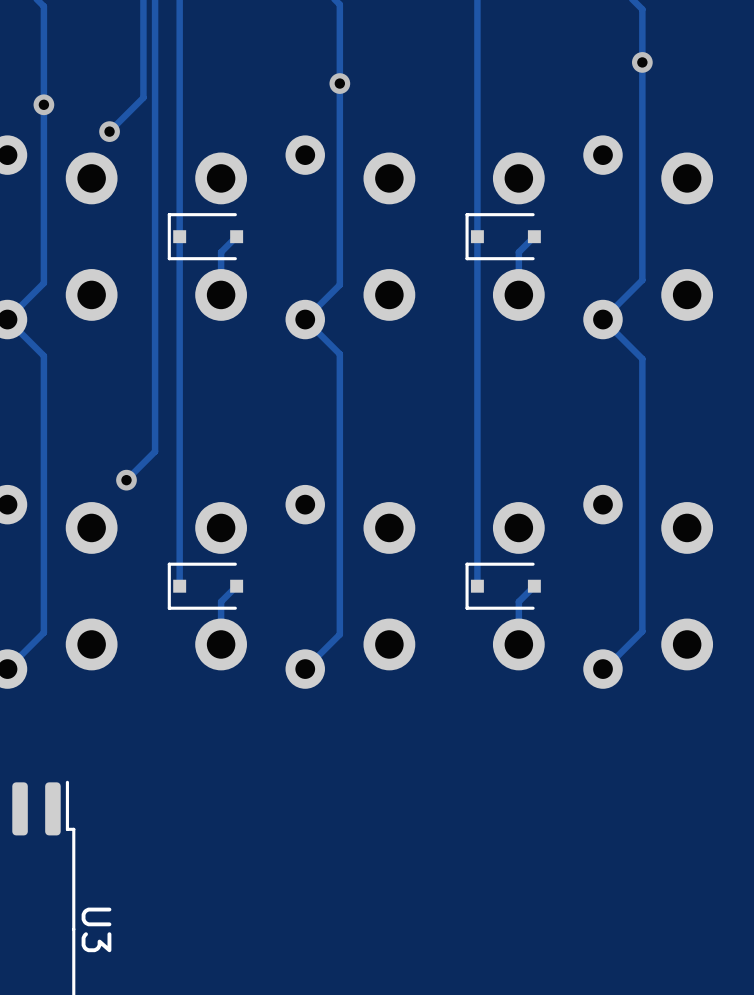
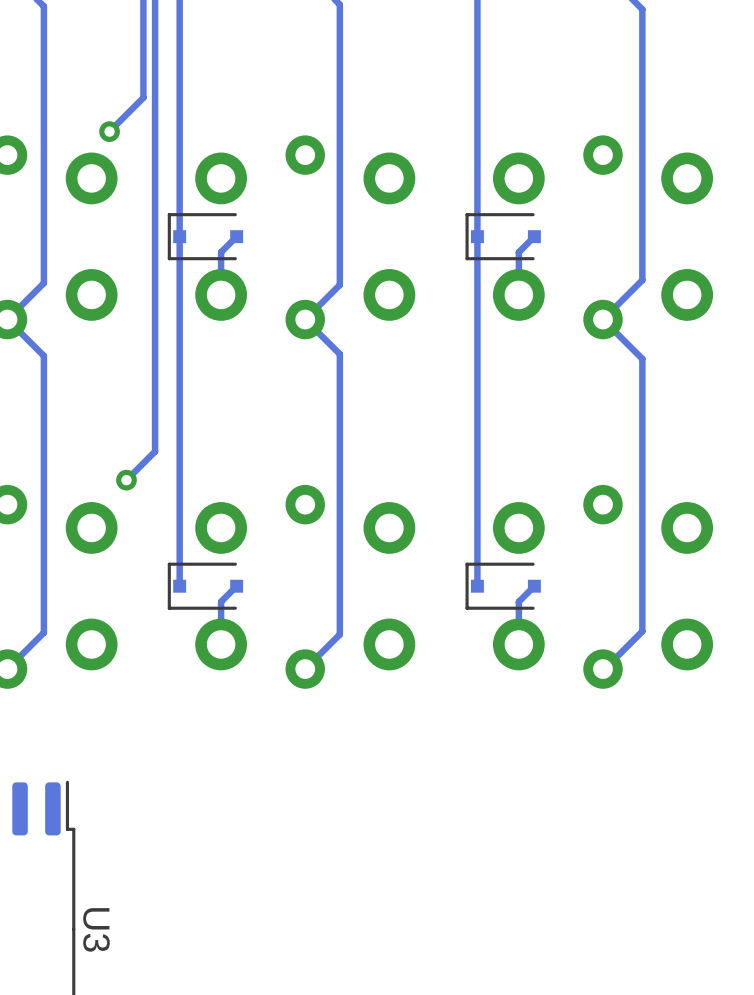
via: (642, 62) -> none
via: (339, 83) -> none
via: (43, 104) -> none

